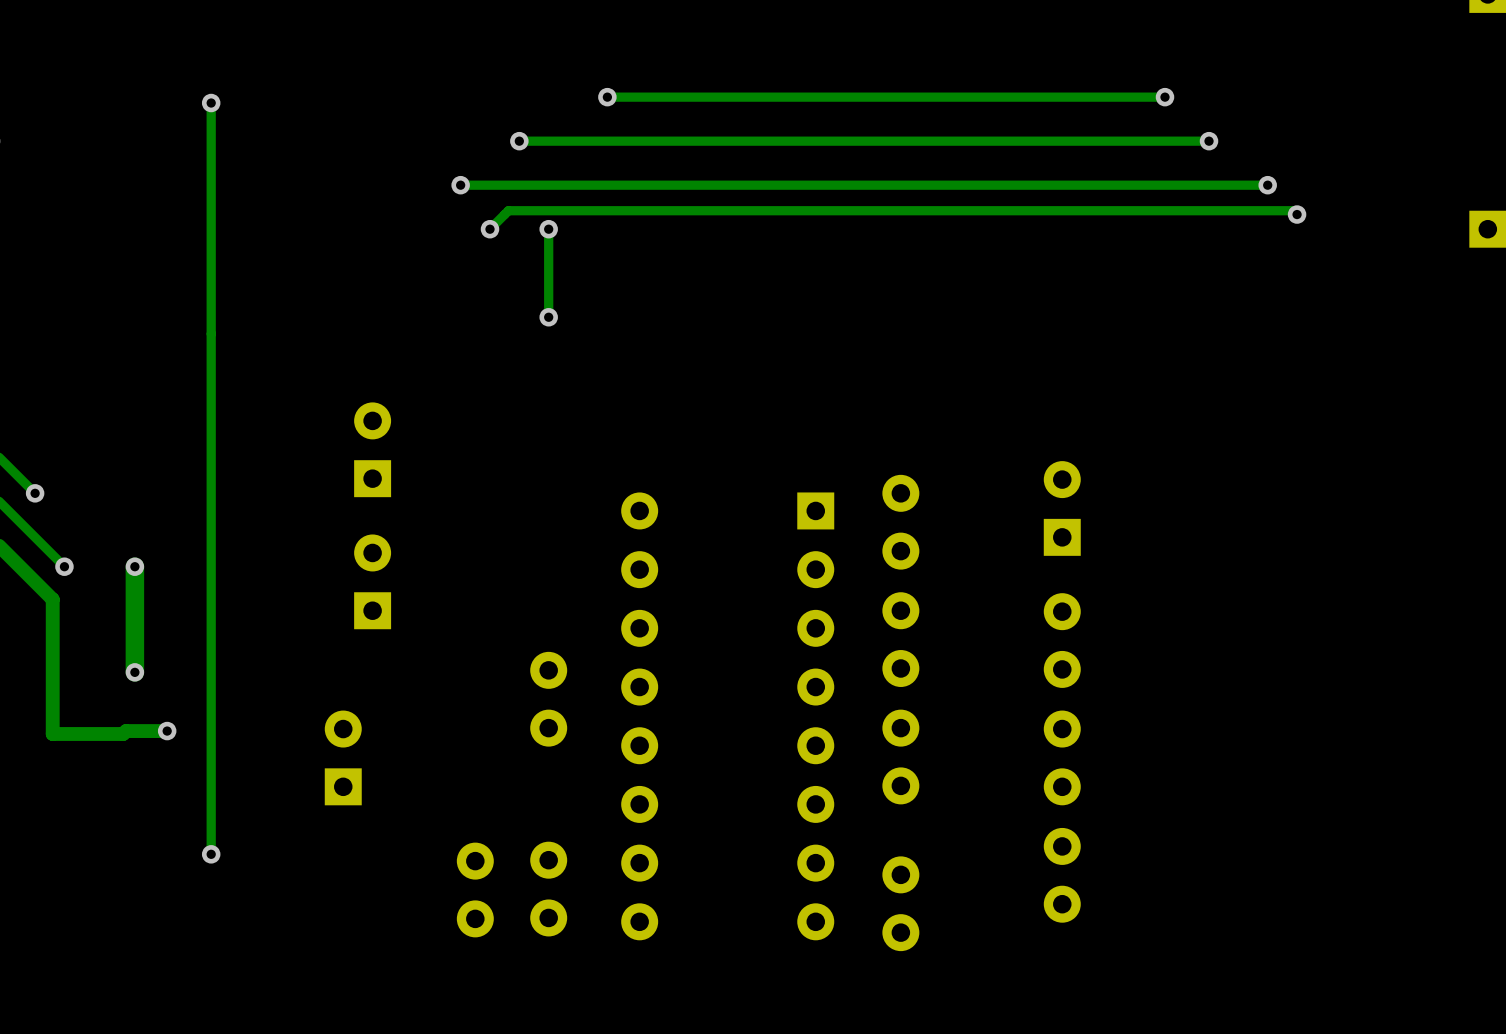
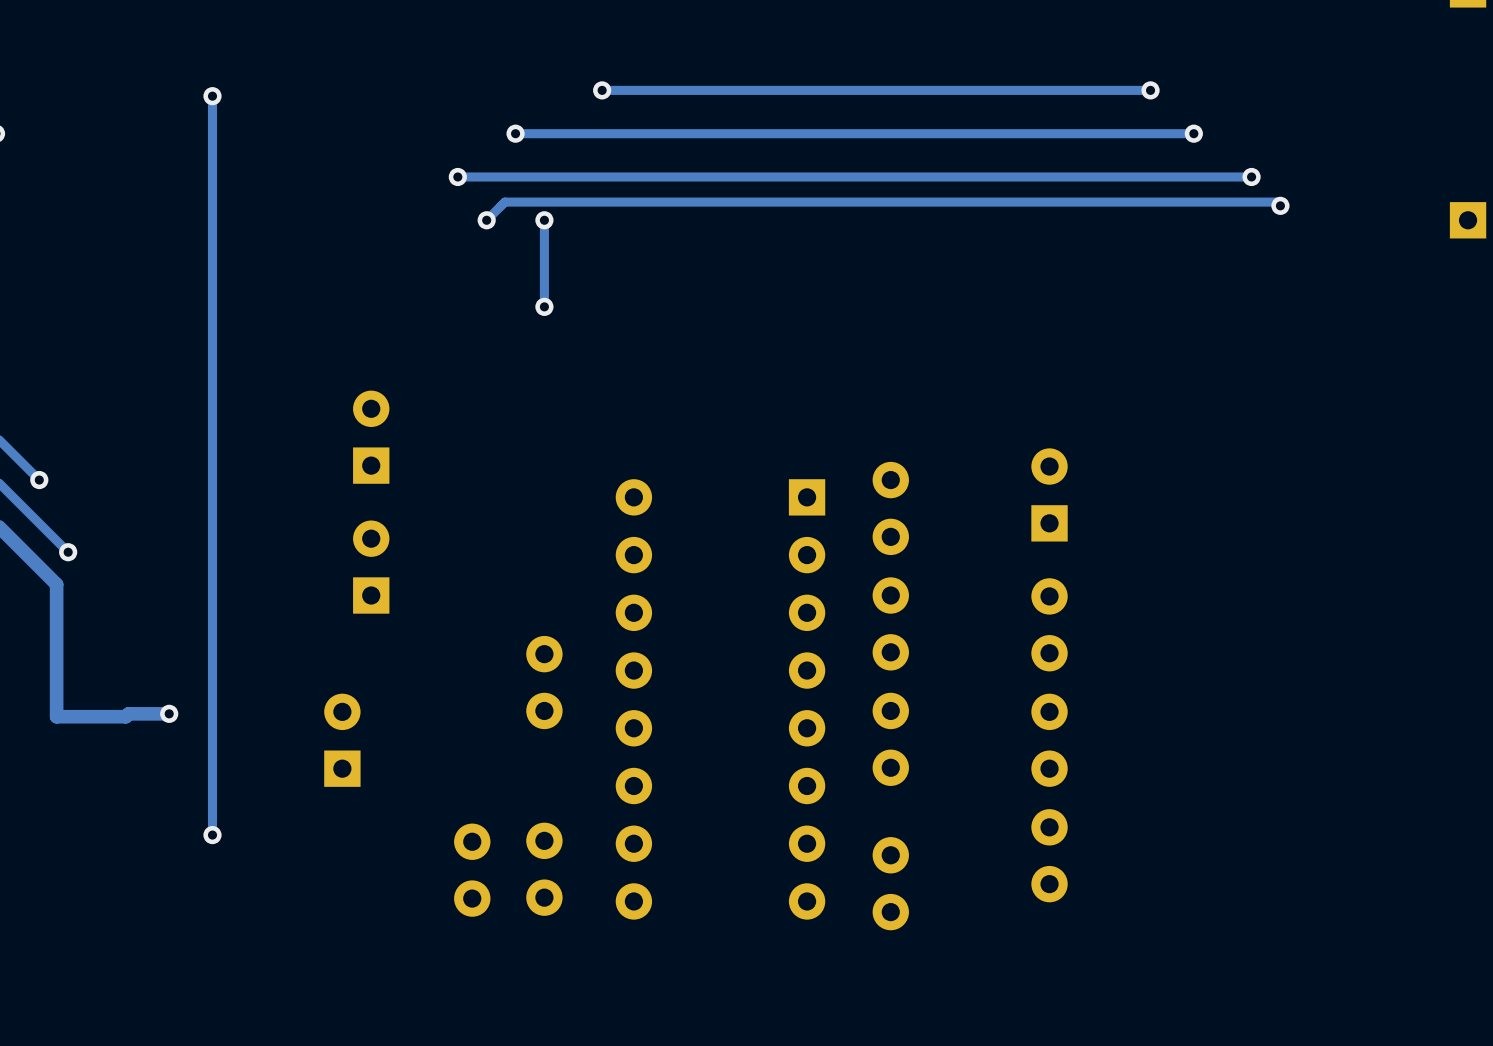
track: (134, 566) (134, 672) -> none
via: (134, 566) -> none
via: (134, 672) -> none

